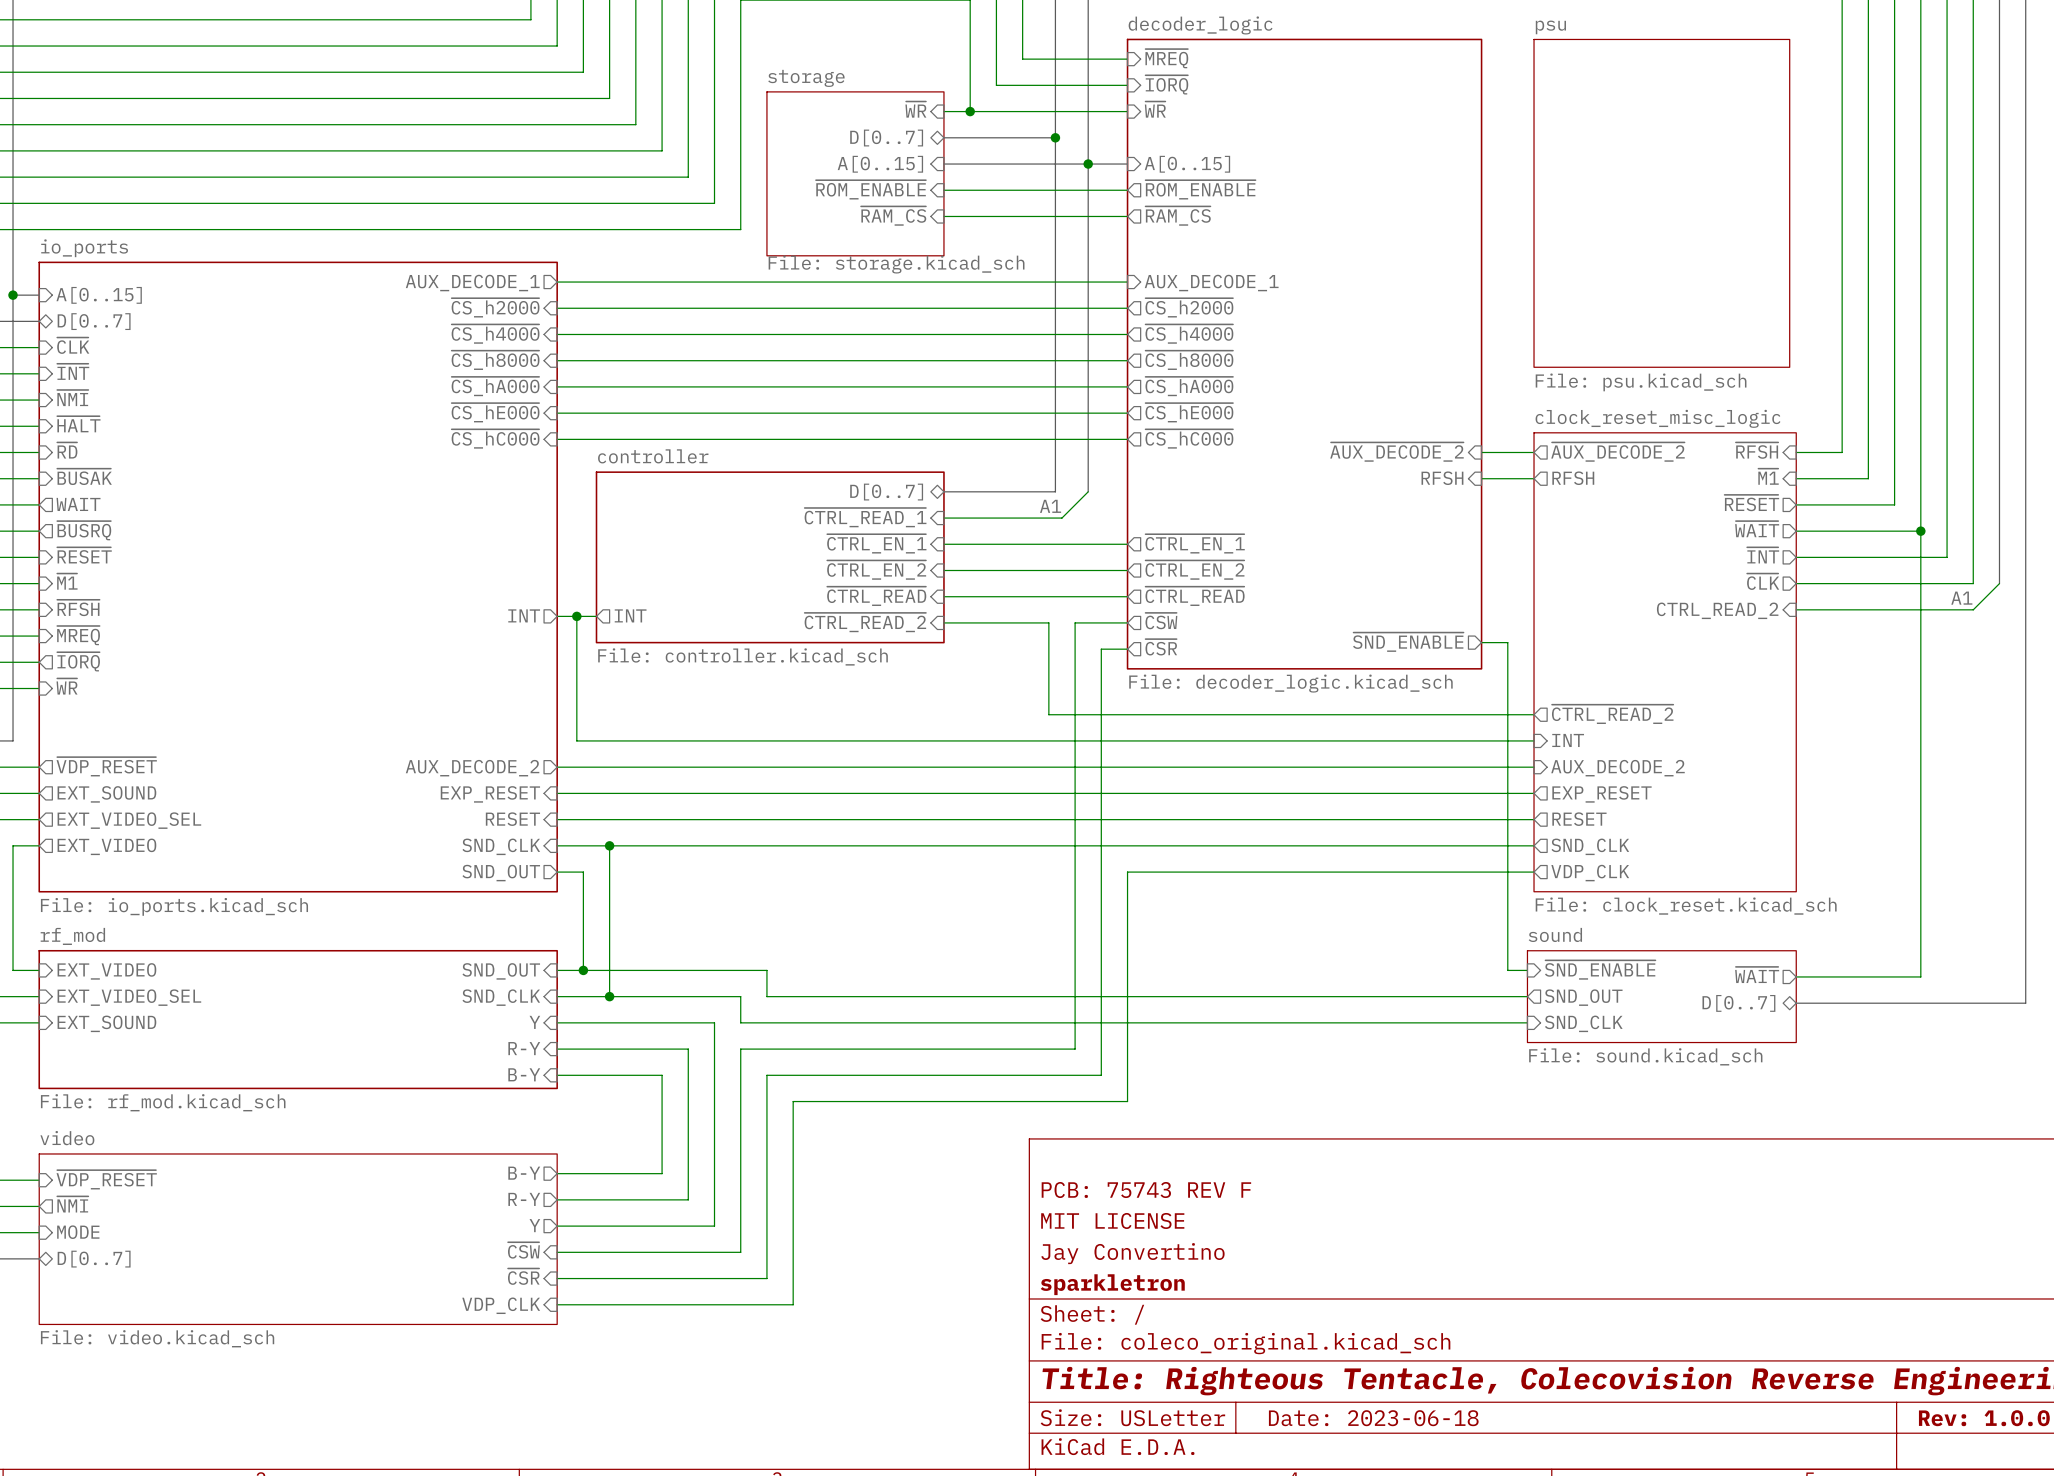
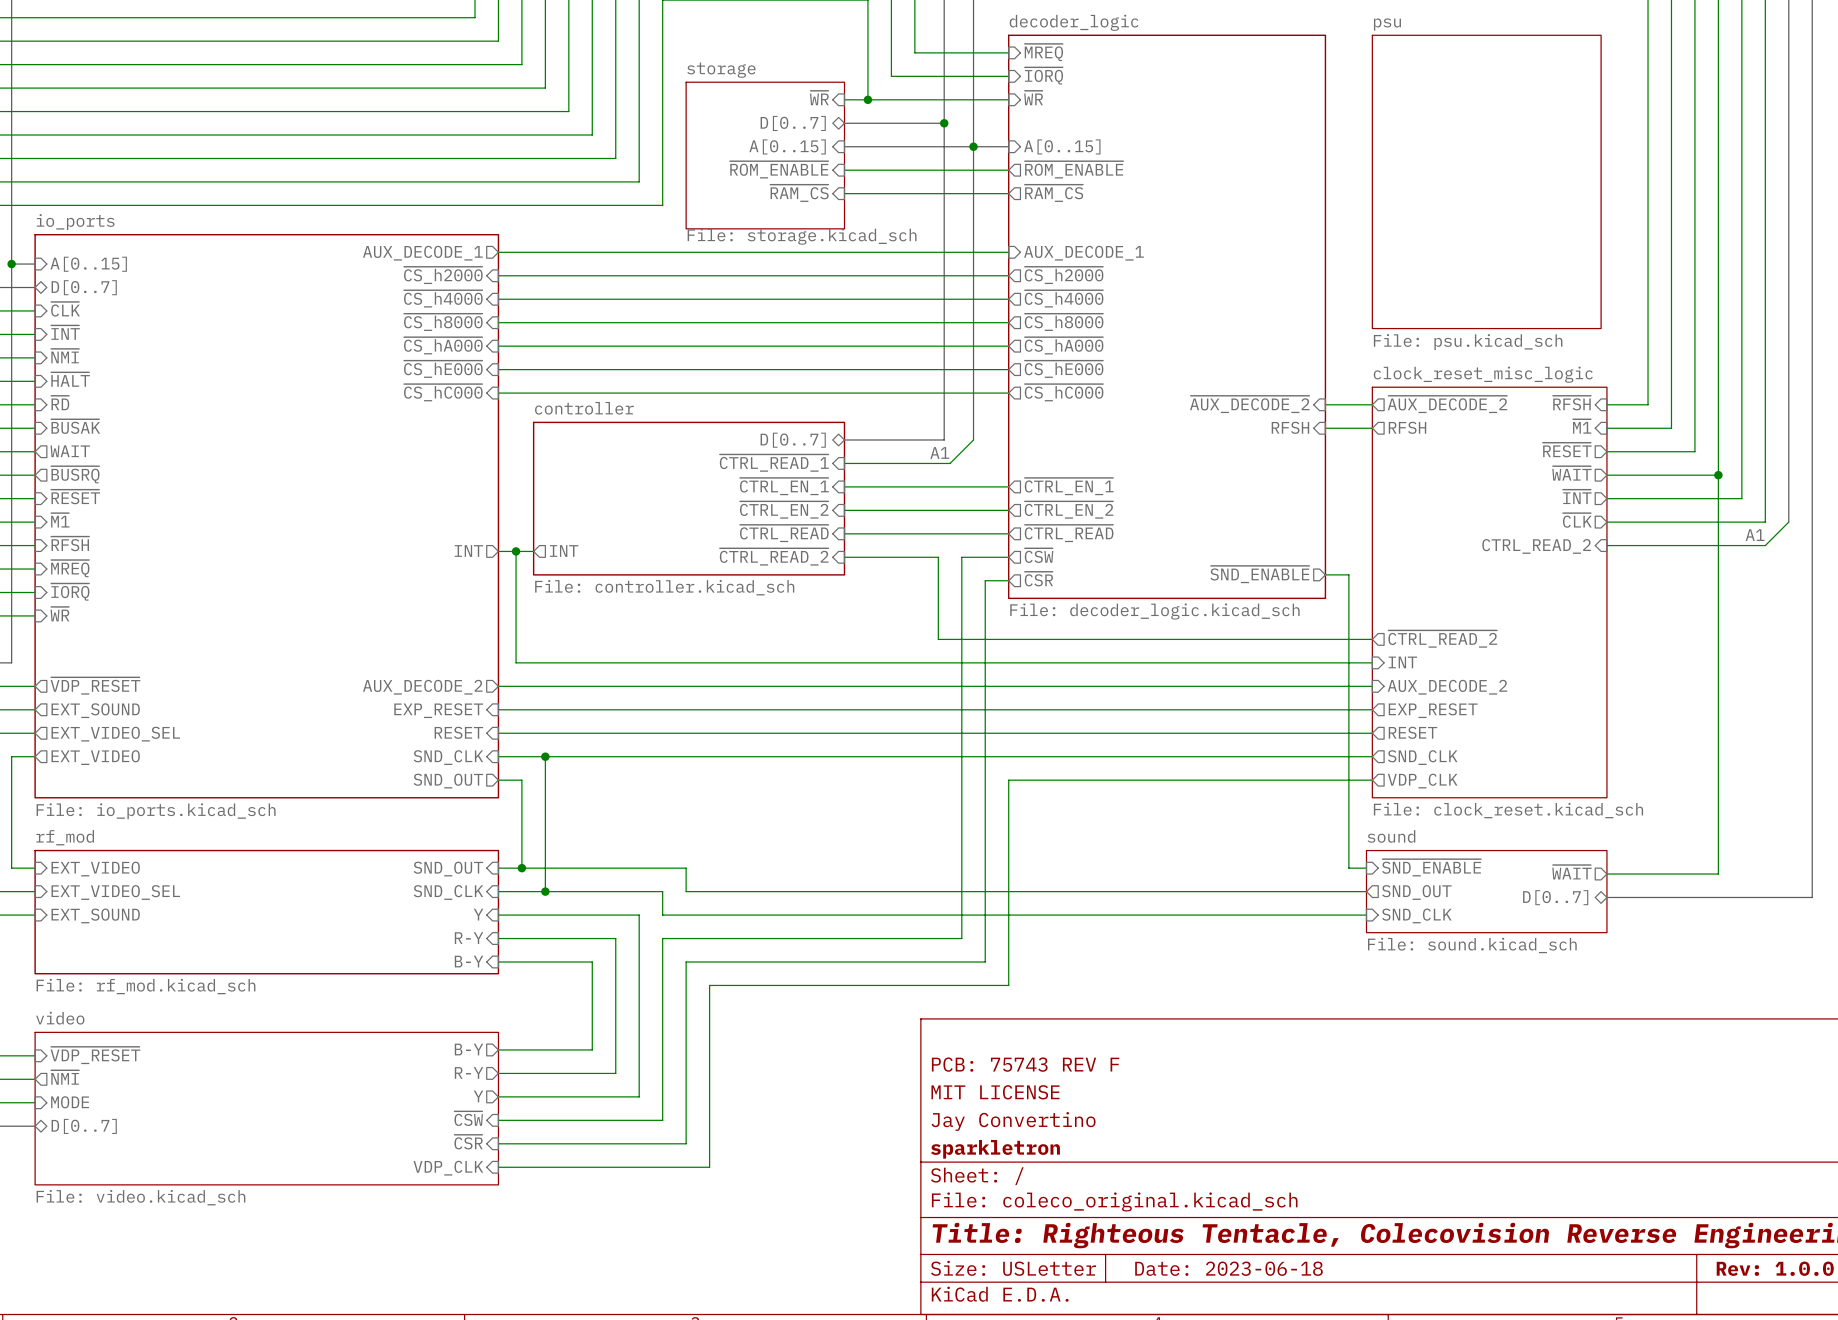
sheet pin shape: output (78, 661) -> input (70, 592)

